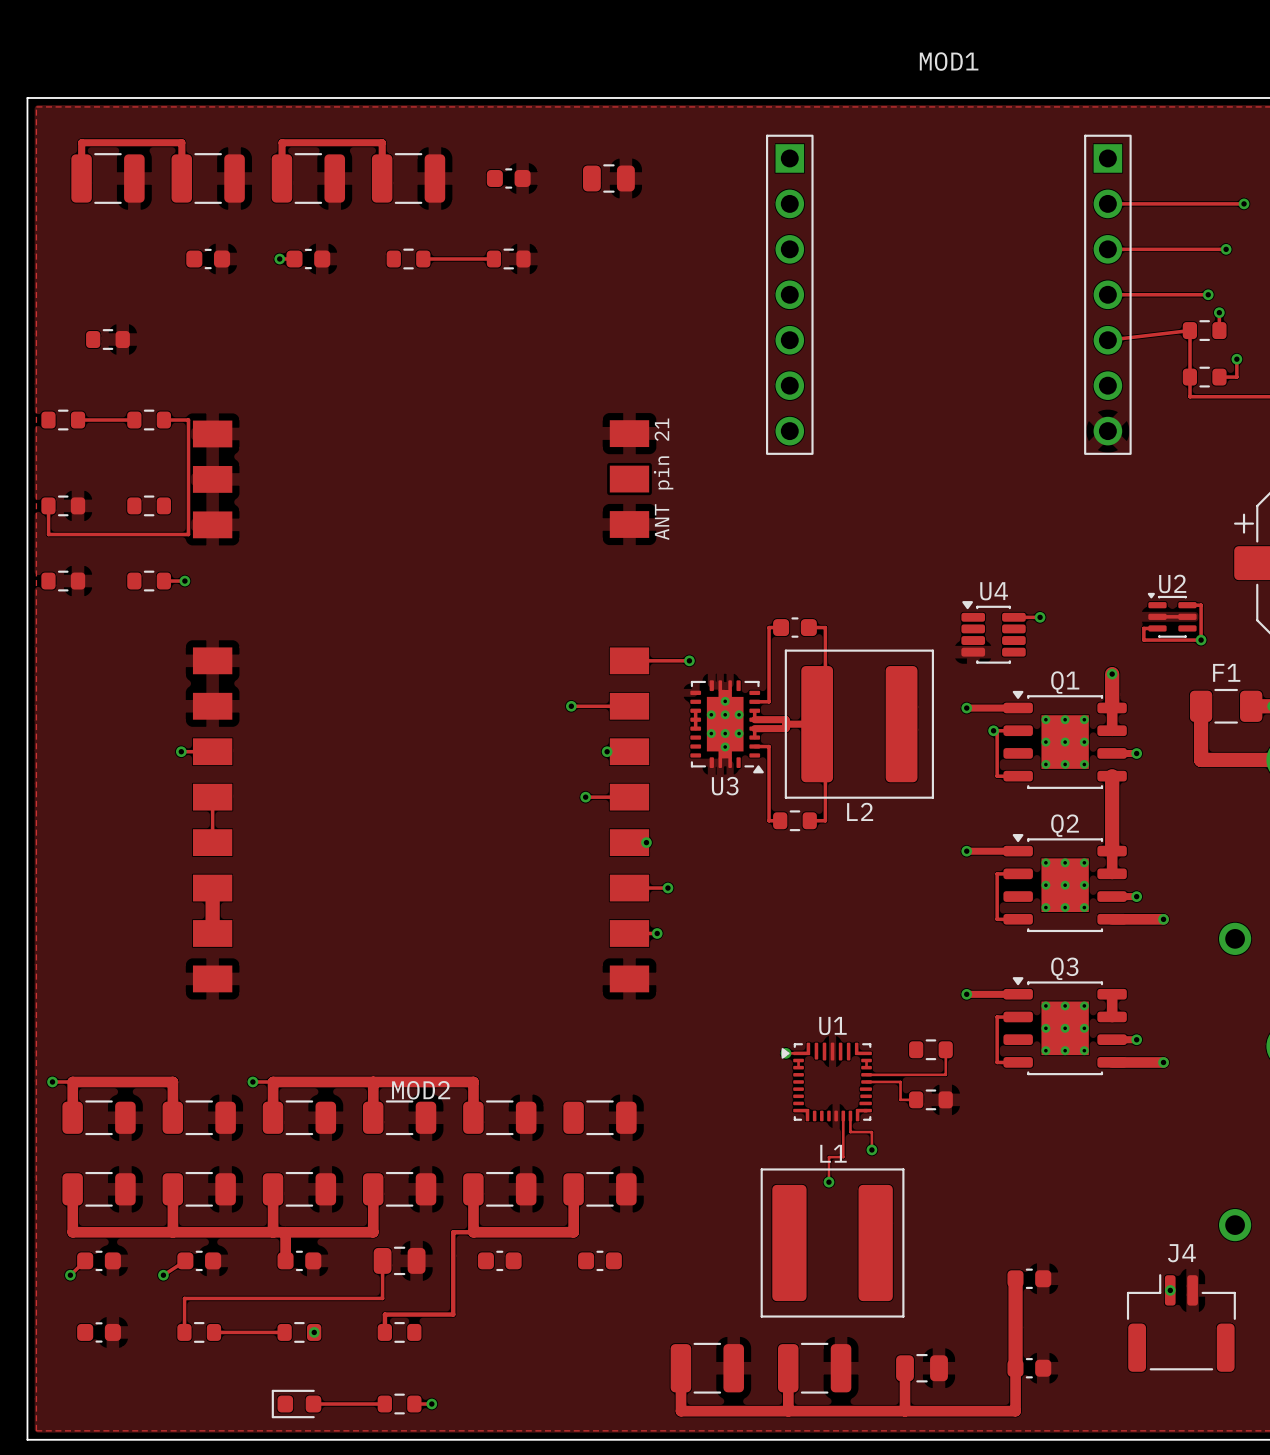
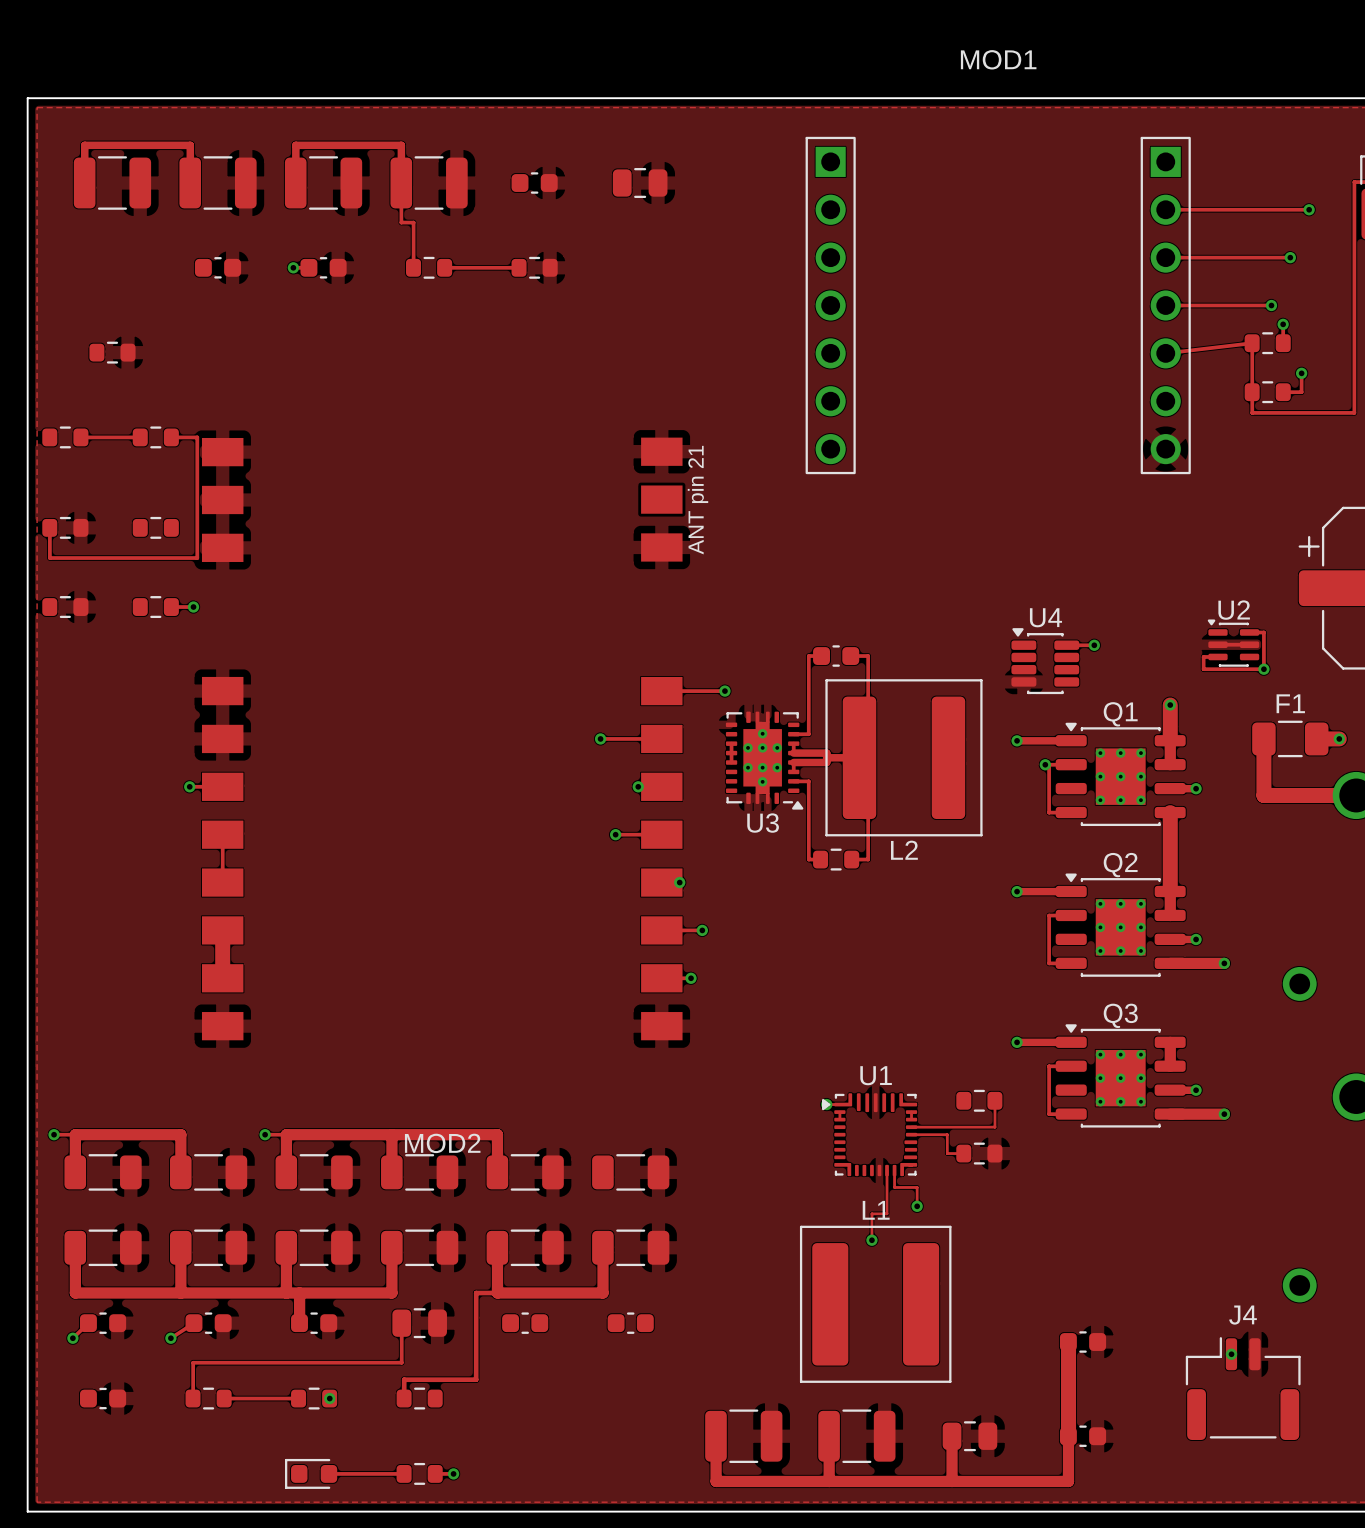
track: none -> (401, 183) (401, 222) (413, 222) (413, 267)

